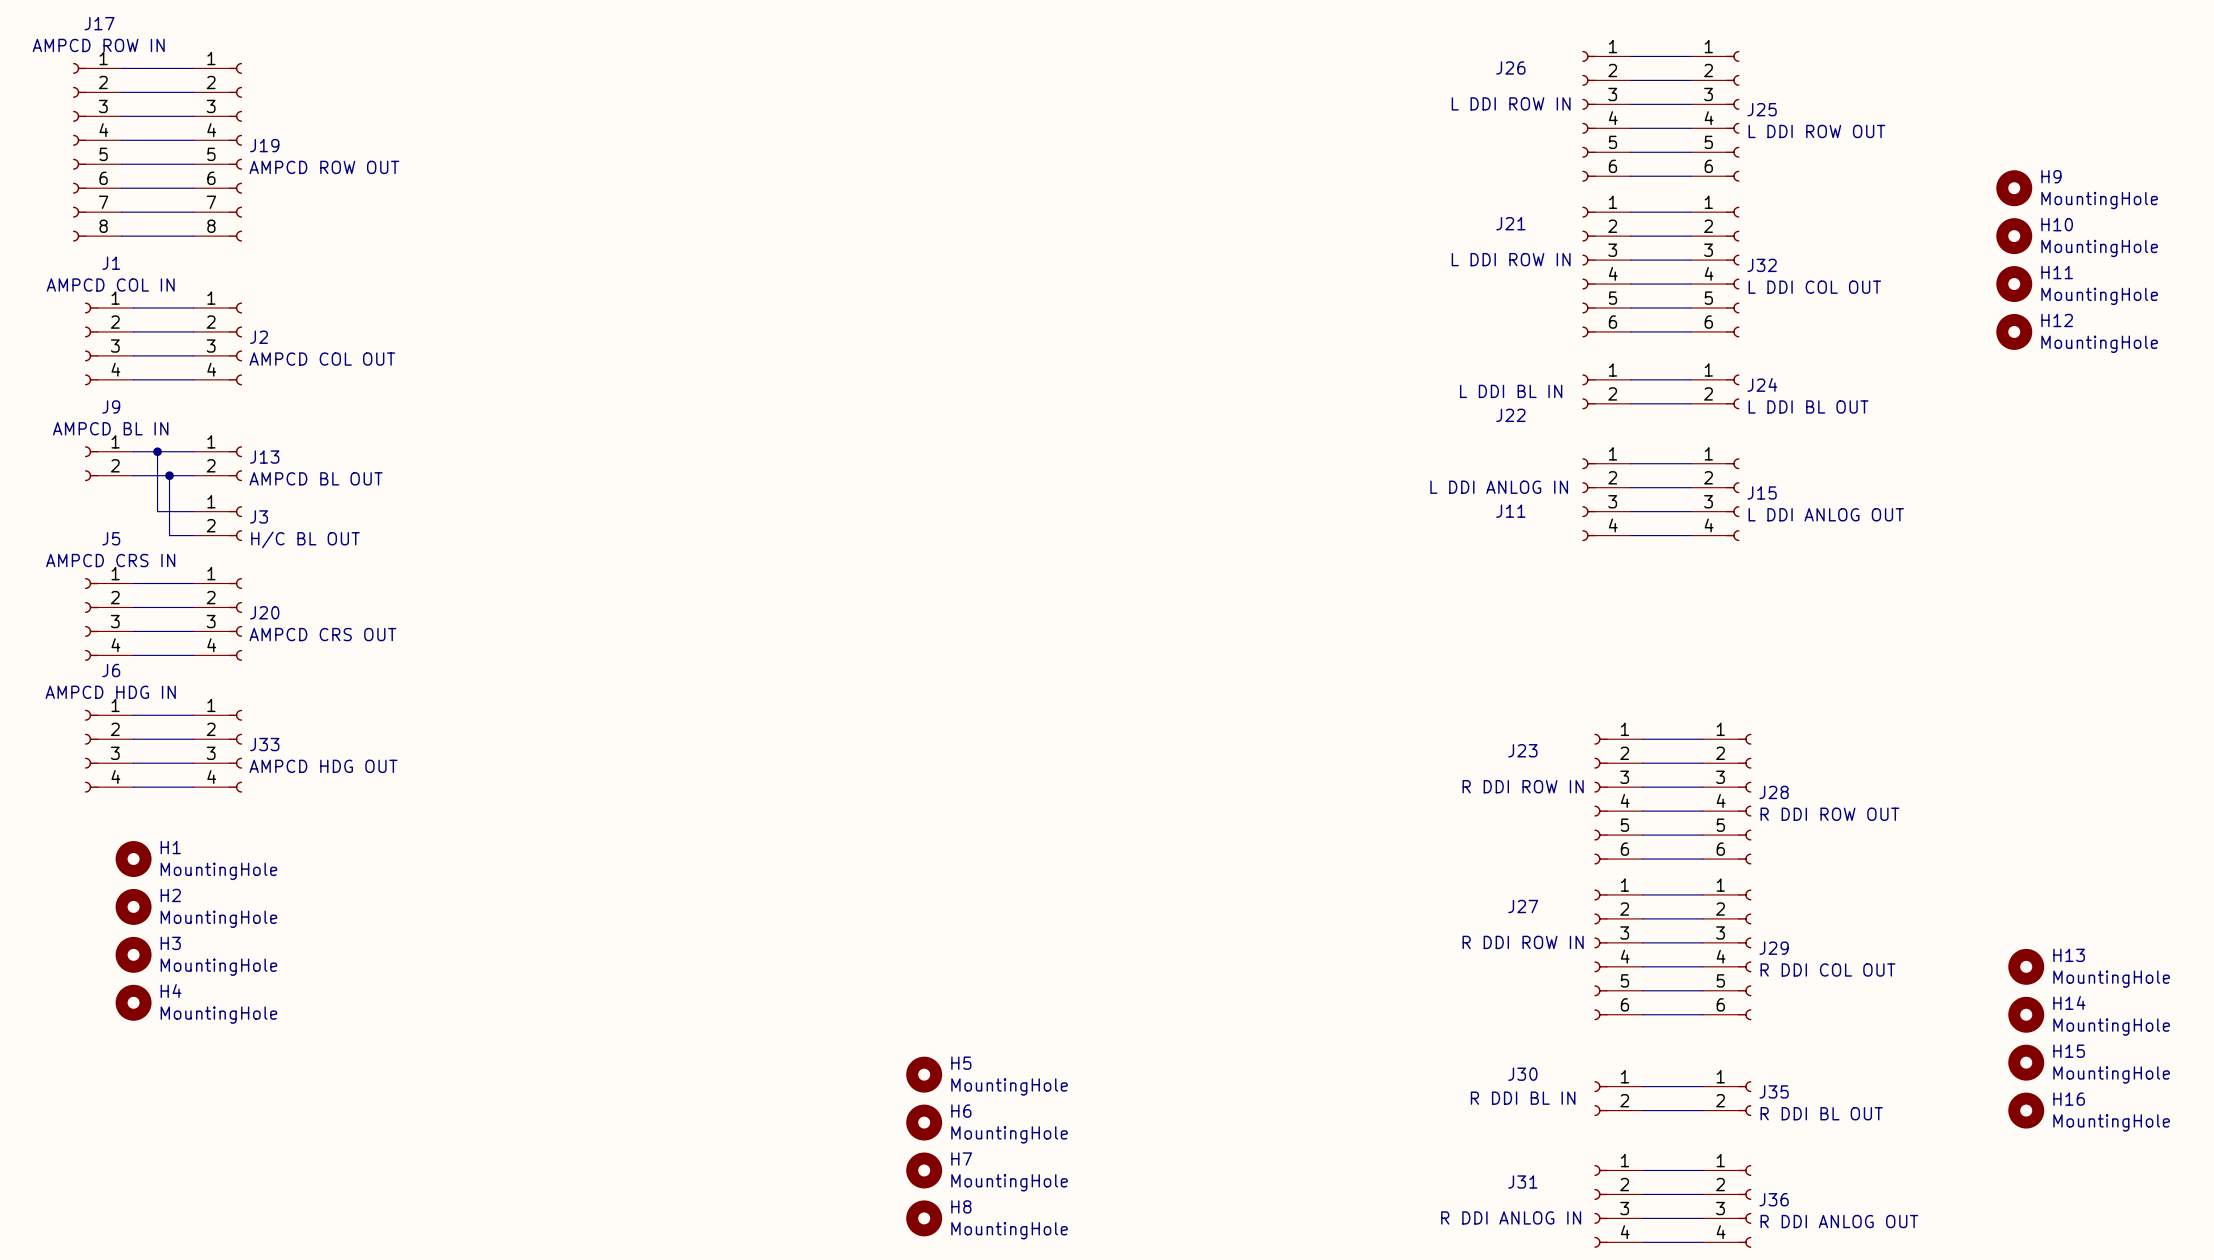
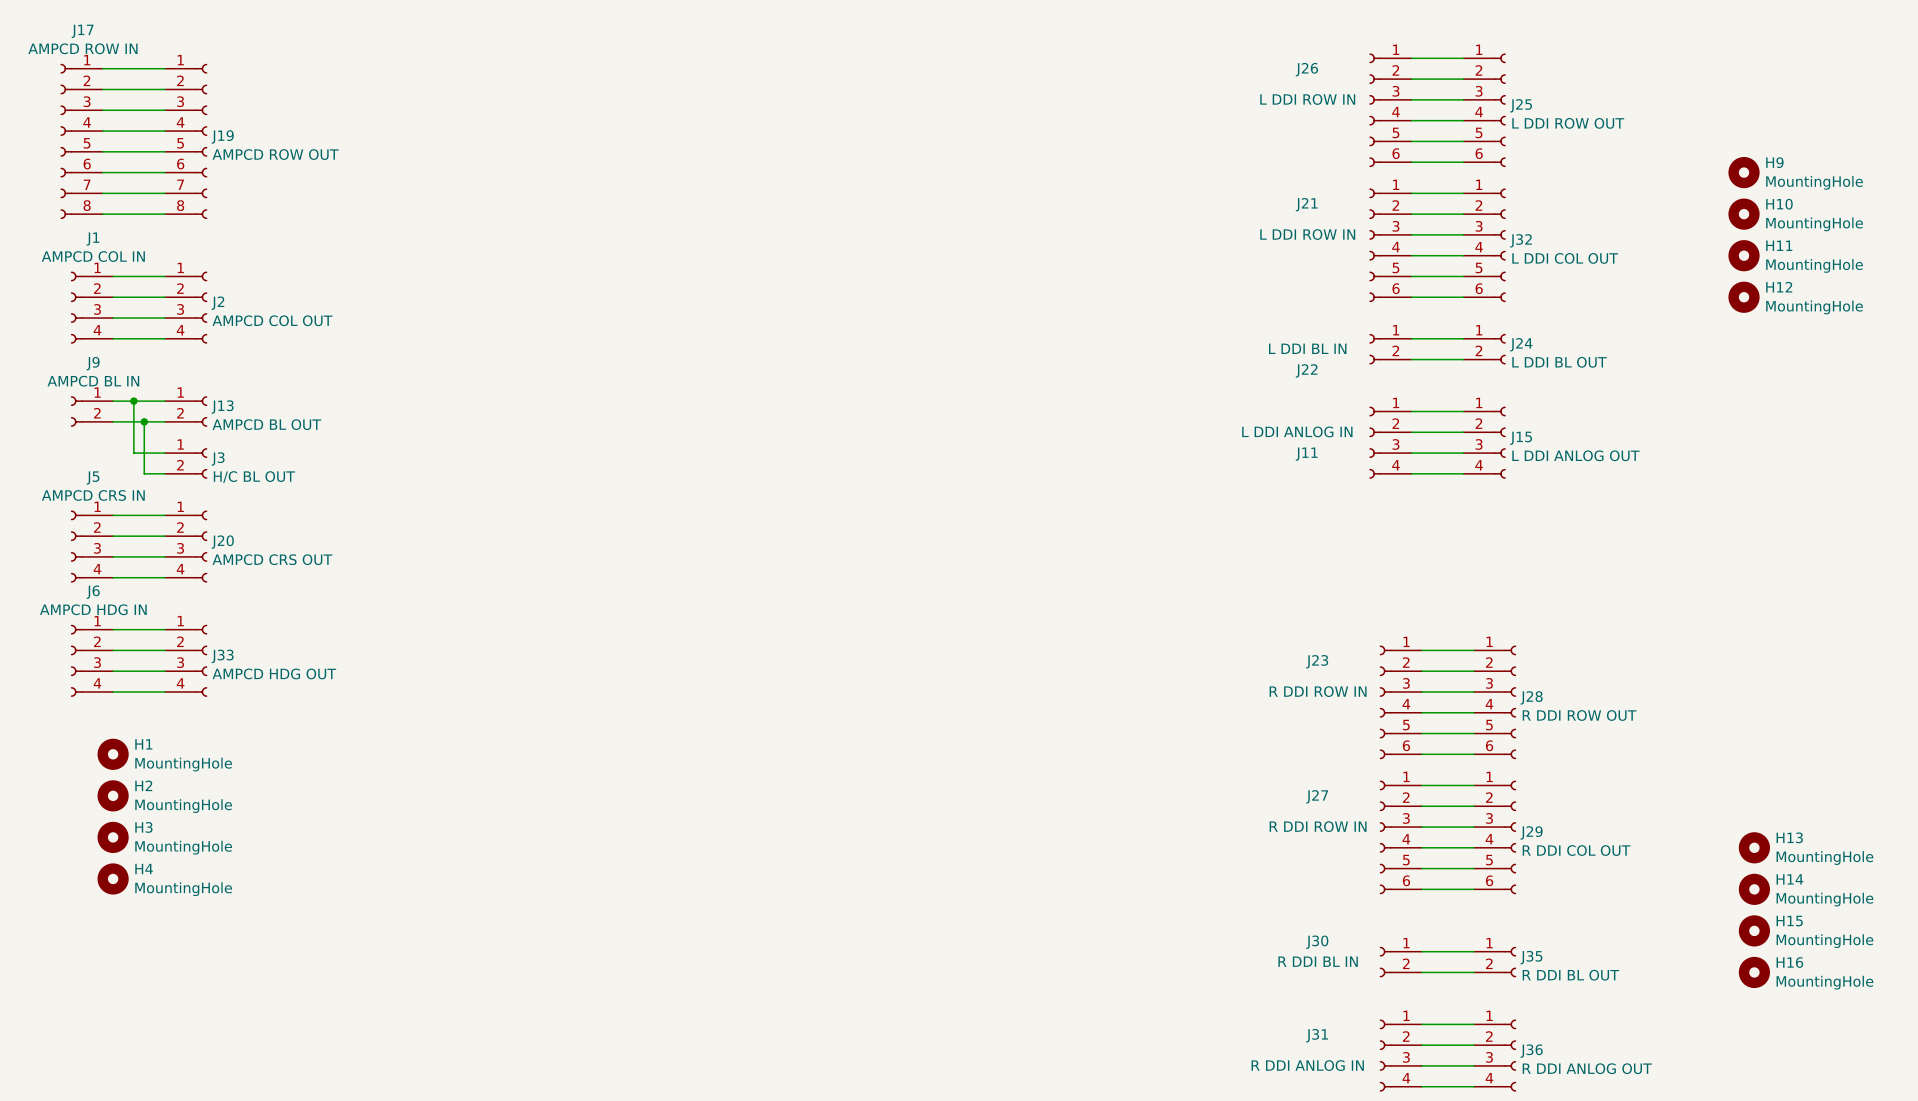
H5: MountingHole (924, 1074) -> none
H6: MountingHole (924, 1122) -> none
H7: MountingHole (924, 1170) -> none
H8: MountingHole (924, 1218) -> none

